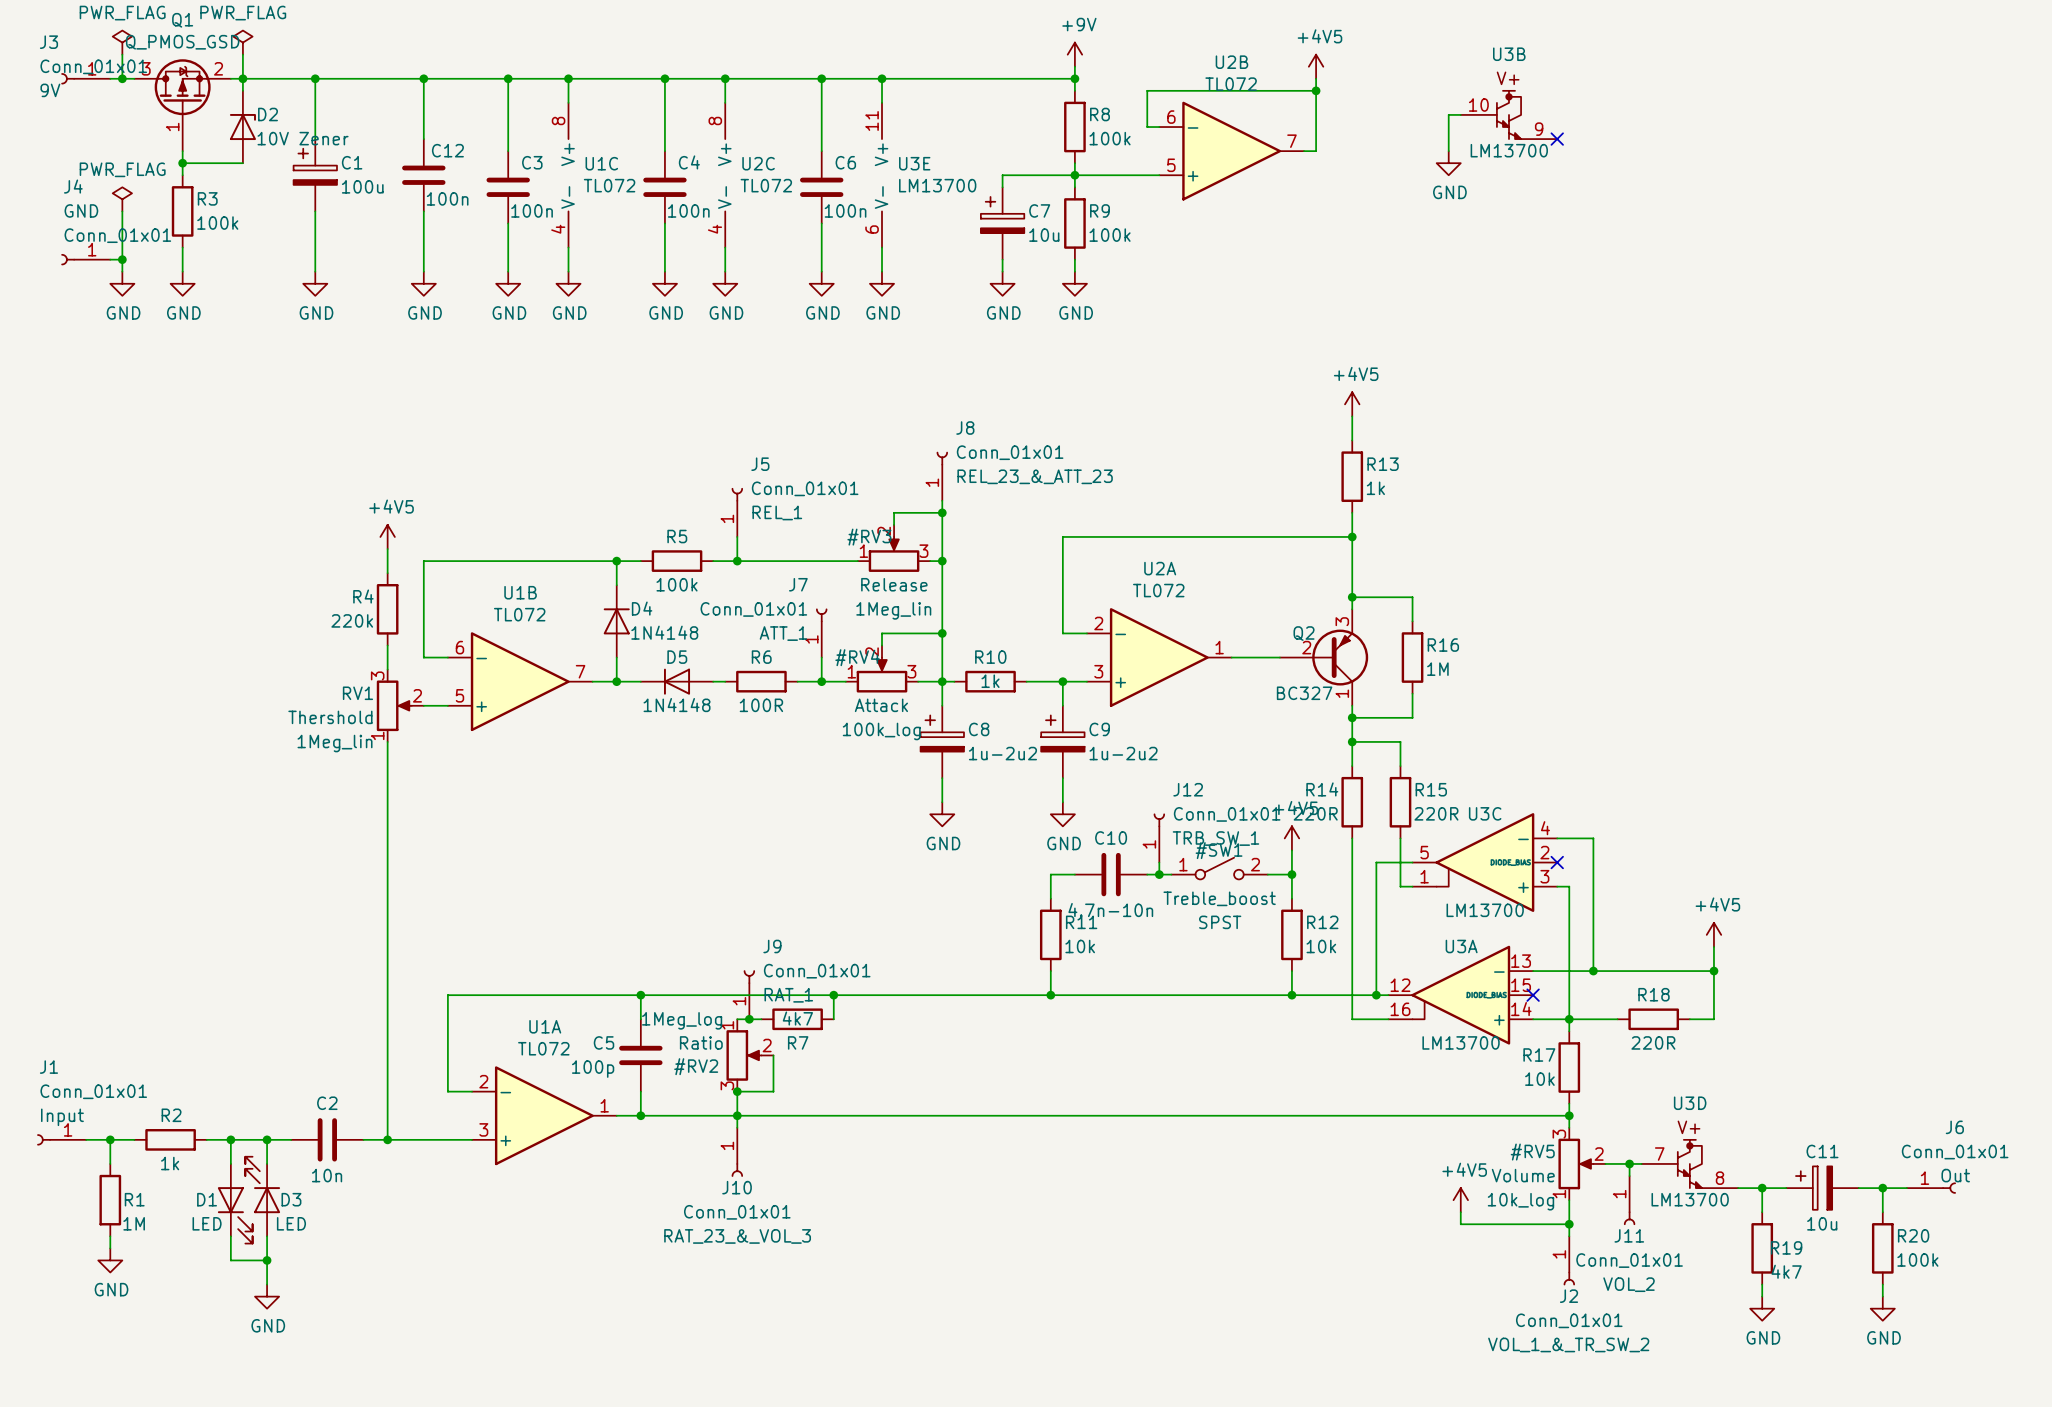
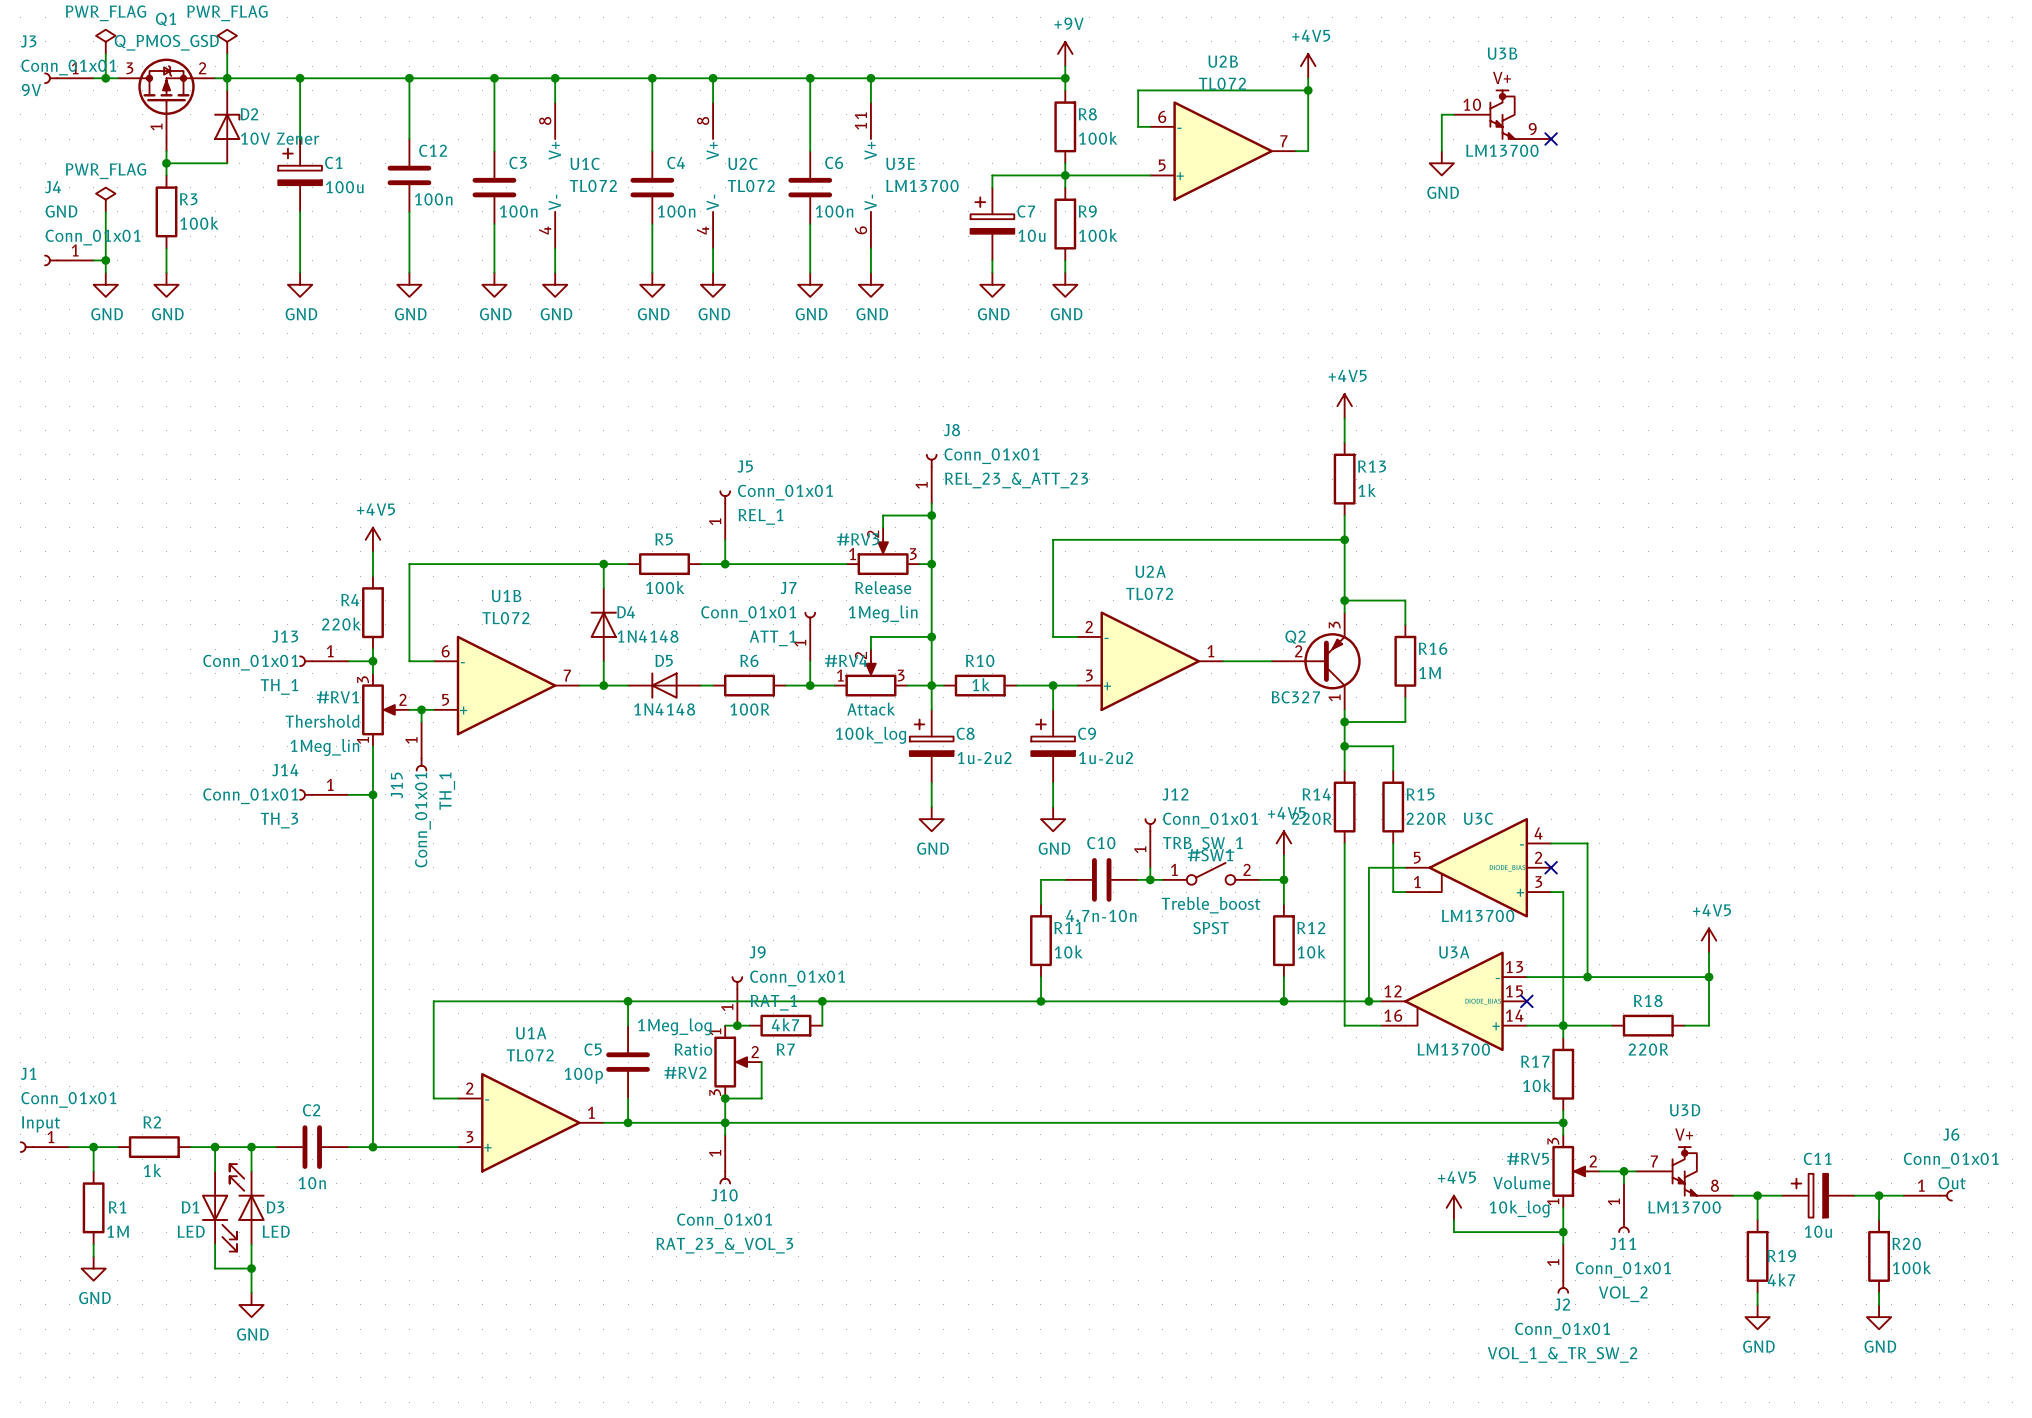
J13: none -> Conn_01x01 (324, 661)
wire: none -> (348, 661) (372, 661)
junction: none -> (372, 661)
#RV1: none -> 1Meg_lin (385, 709)
wire: none -> (421, 709) (421, 722)
junction: none -> (421, 709)
J15: none -> Conn_01x01 (421, 746)
J14: none -> Conn_01x01 (324, 794)
wire: none -> (348, 794) (372, 794)
junction: none -> (372, 794)

